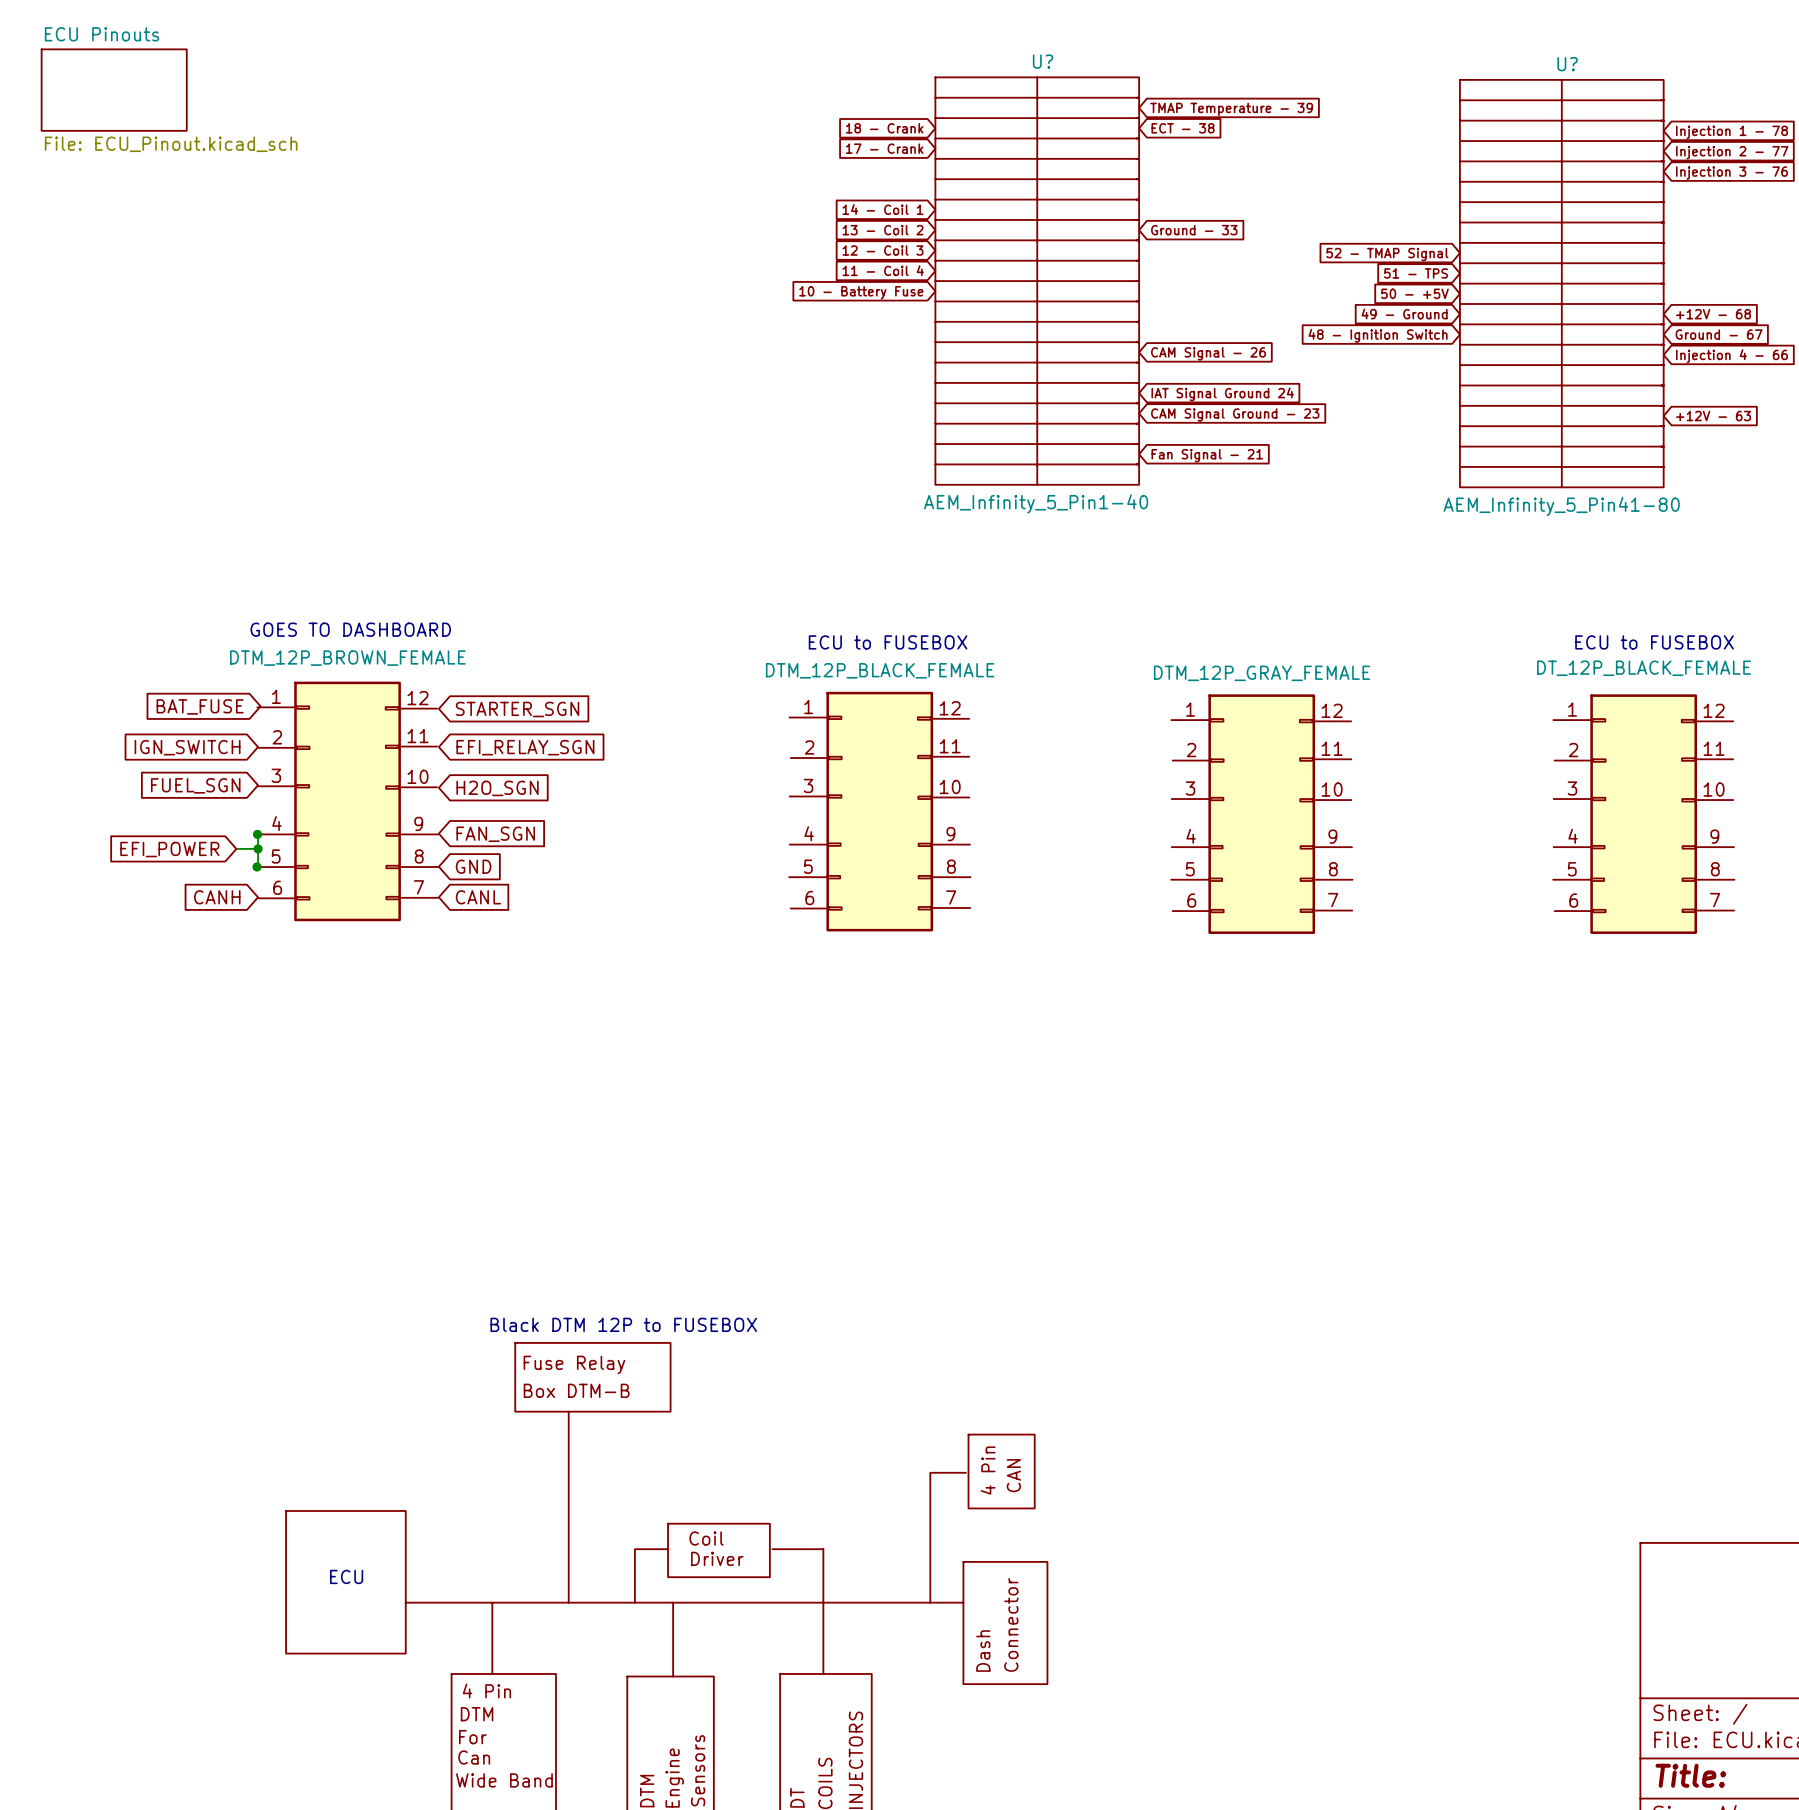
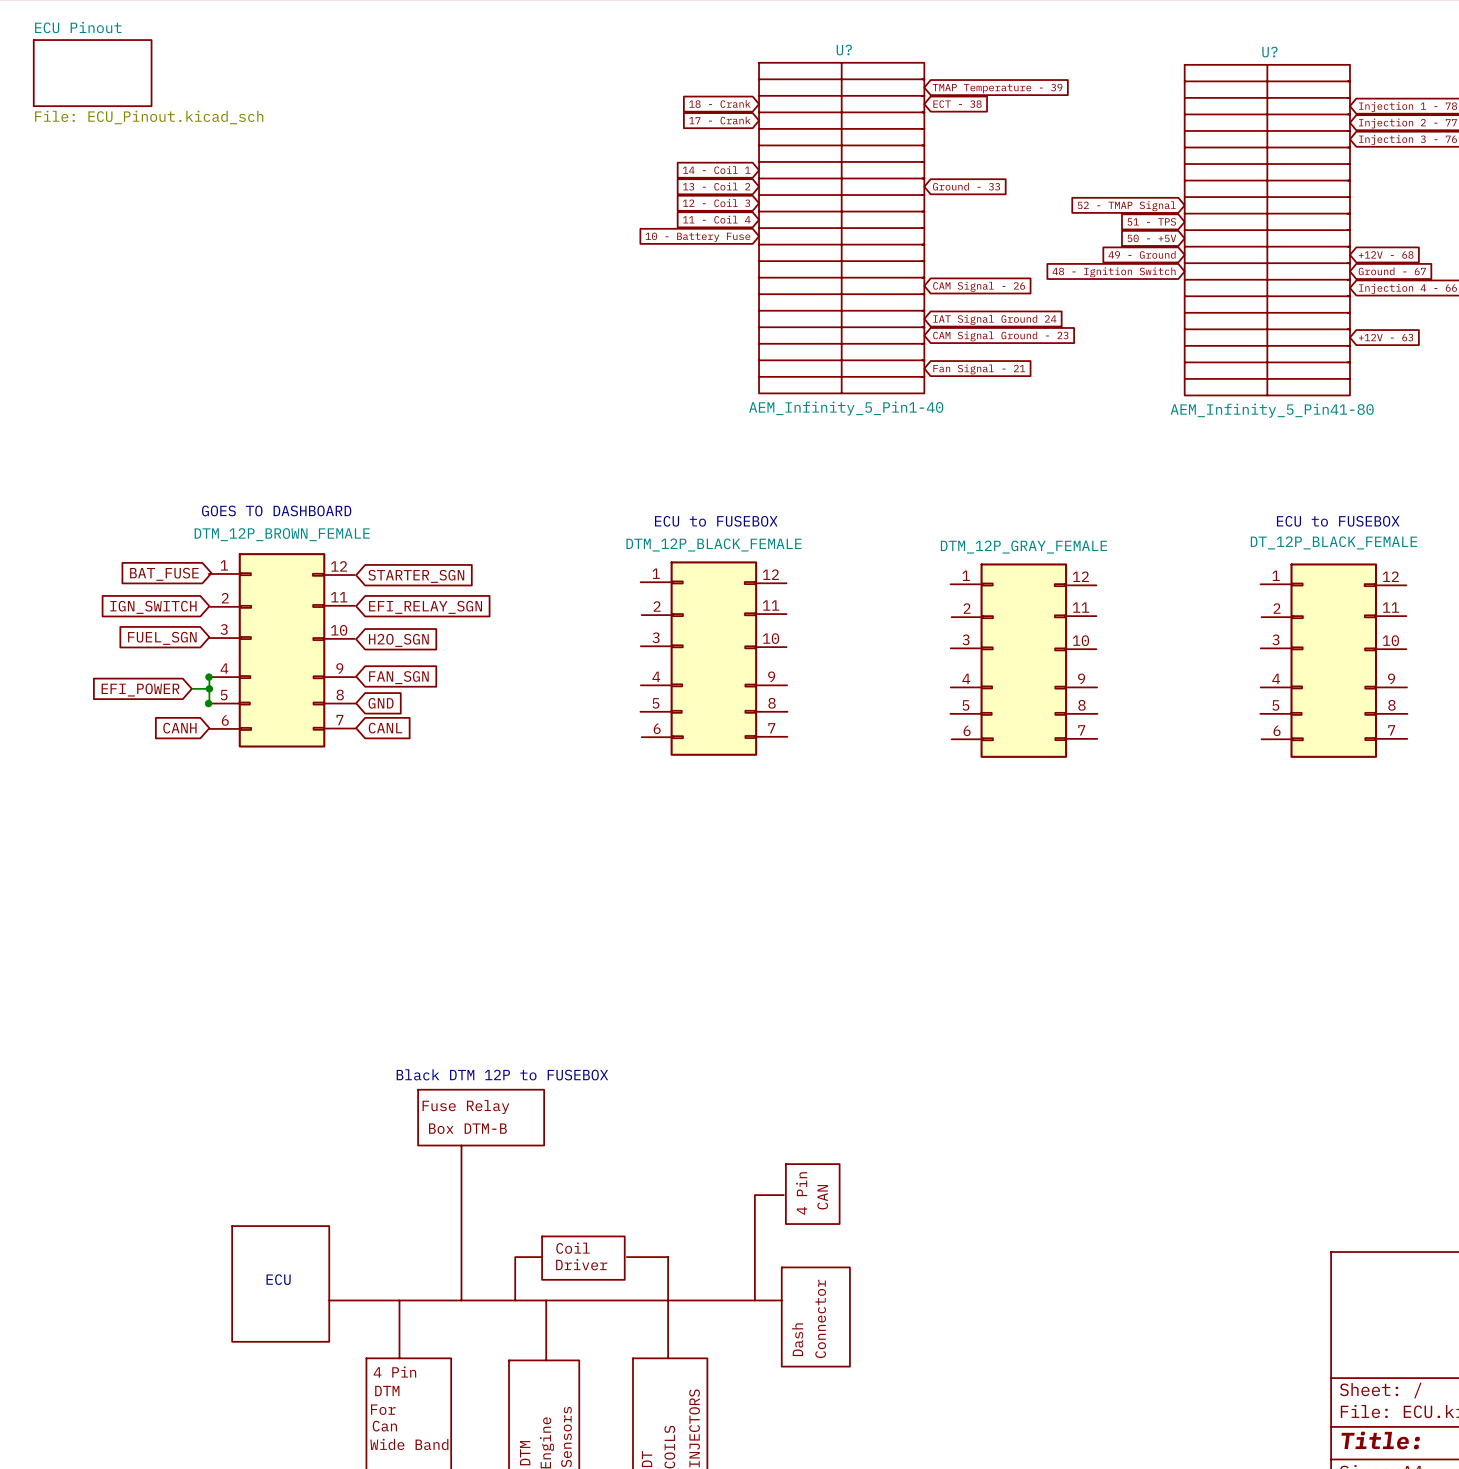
sheet ECU Pinouts name: ECU Pinouts (102, 34) -> ECU Pinout (78, 27)

